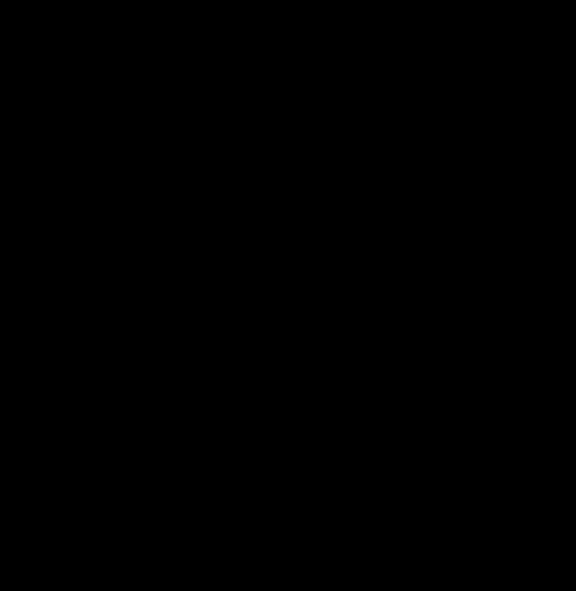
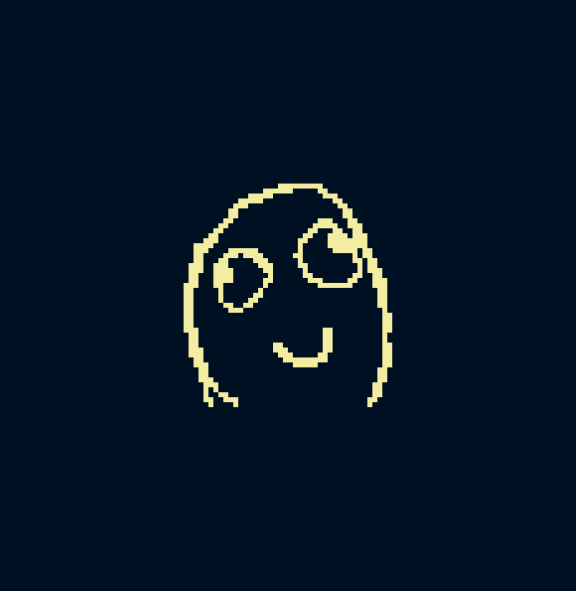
drawing: none -> [183, 183, 393, 408]

